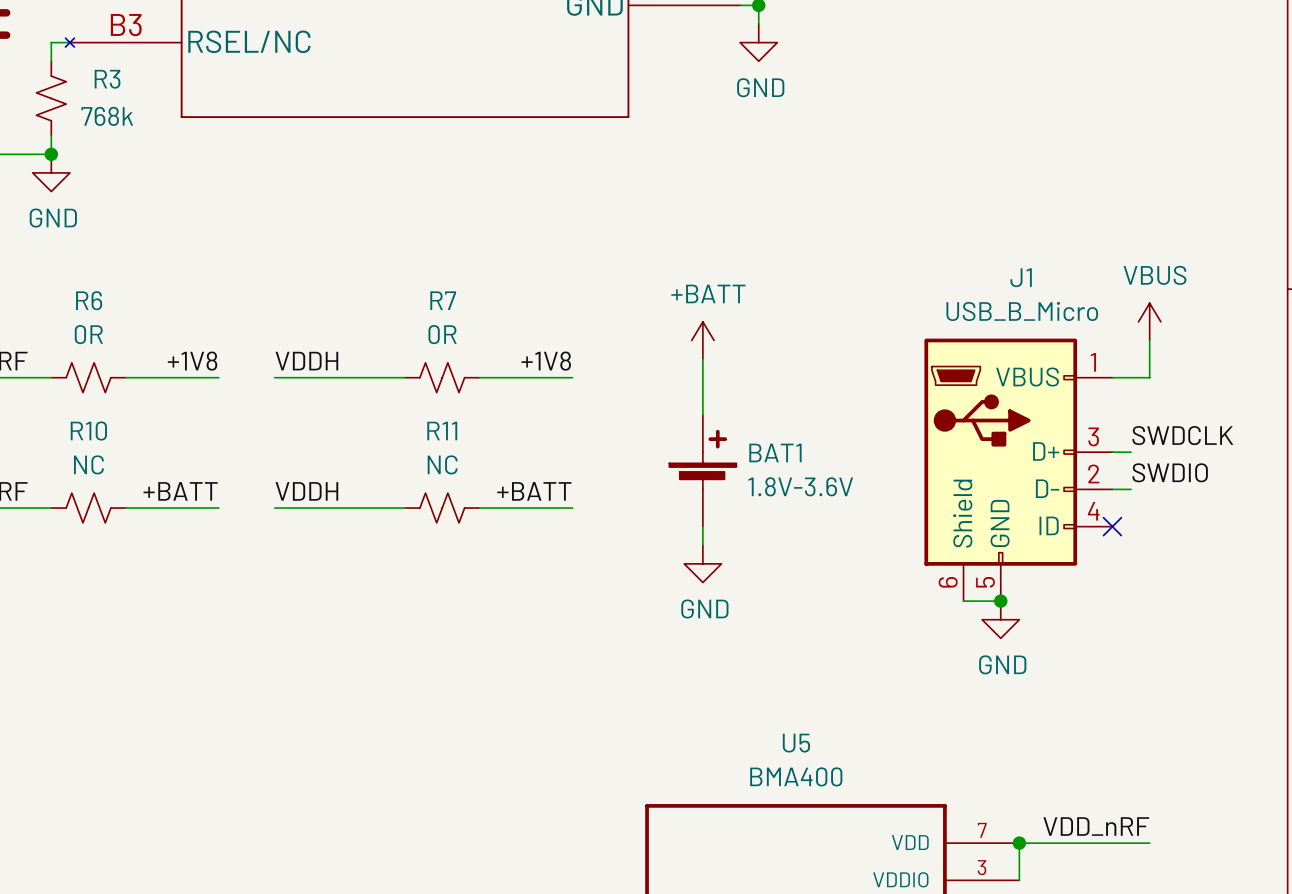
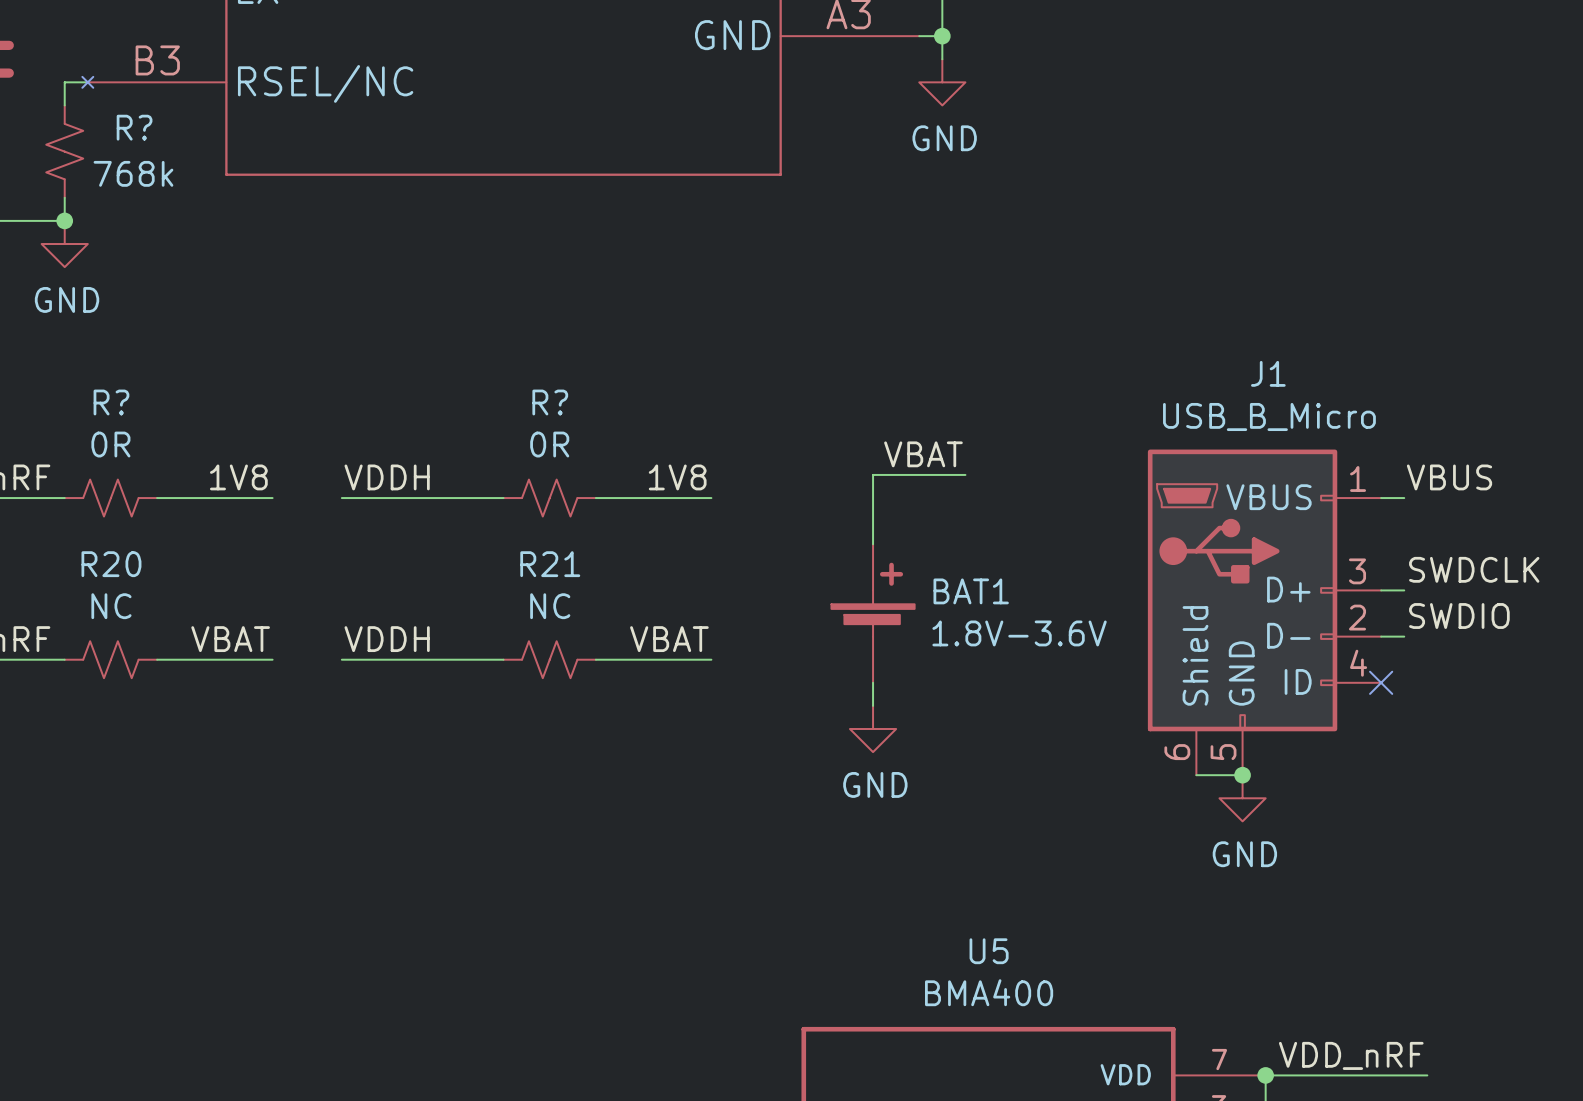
R3 name: R3 (107, 79) -> R? (134, 127)
R6 name: R6 (89, 300) -> R? (111, 402)
R7 name: R7 (443, 300) -> R? (550, 402)
power symbol: VBUS (1149, 321) -> none
power symbol: +BATT (702, 340) -> none
wire: (1149, 340) (1149, 377) (1131, 377) -> none
label: none -> VBAT (923, 454)
wire: none -> (873, 474) (965, 474)
label: +1V8 (192, 361) -> 1V8 (238, 477)
label: +1V8 (546, 361) -> 1V8 (677, 477)
label: none -> VBUS (1449, 477)
R10 name: R10 (88, 431) -> R20 (111, 564)
R11 name: R11 (442, 431) -> R21 (550, 564)
label: +BATT (180, 491) -> VBAT (230, 639)
label: +BATT (534, 491) -> VBAT (669, 639)

